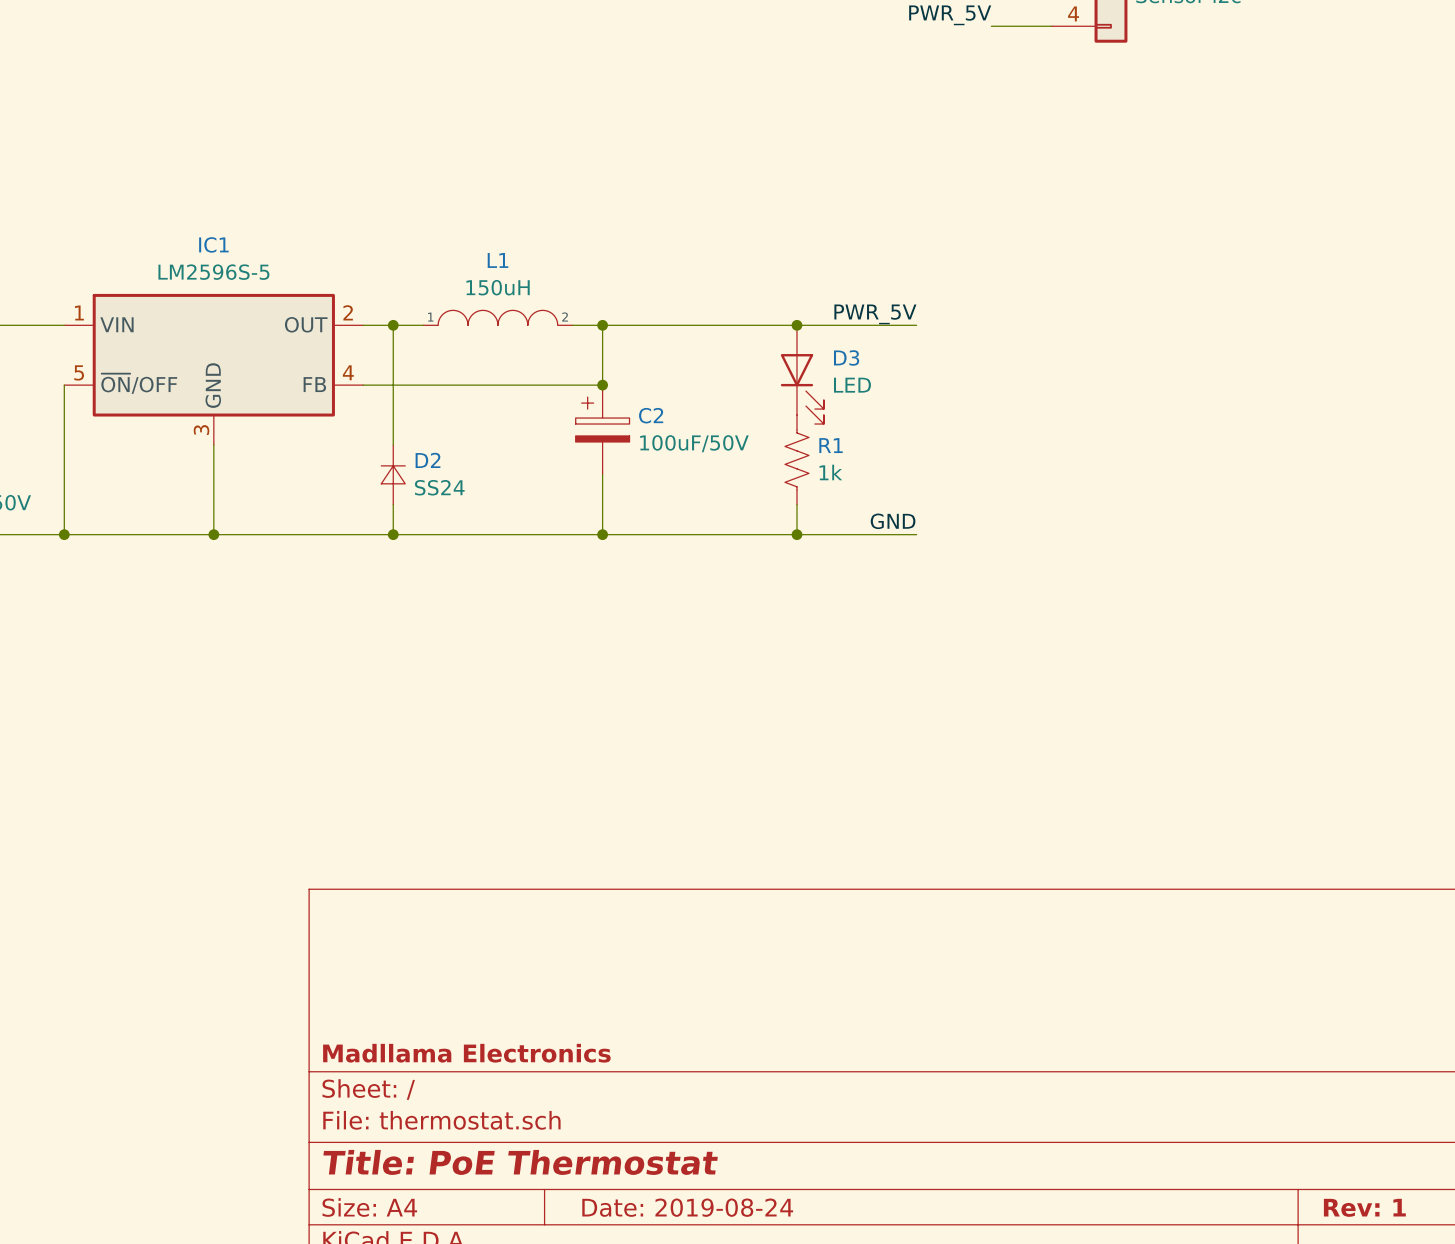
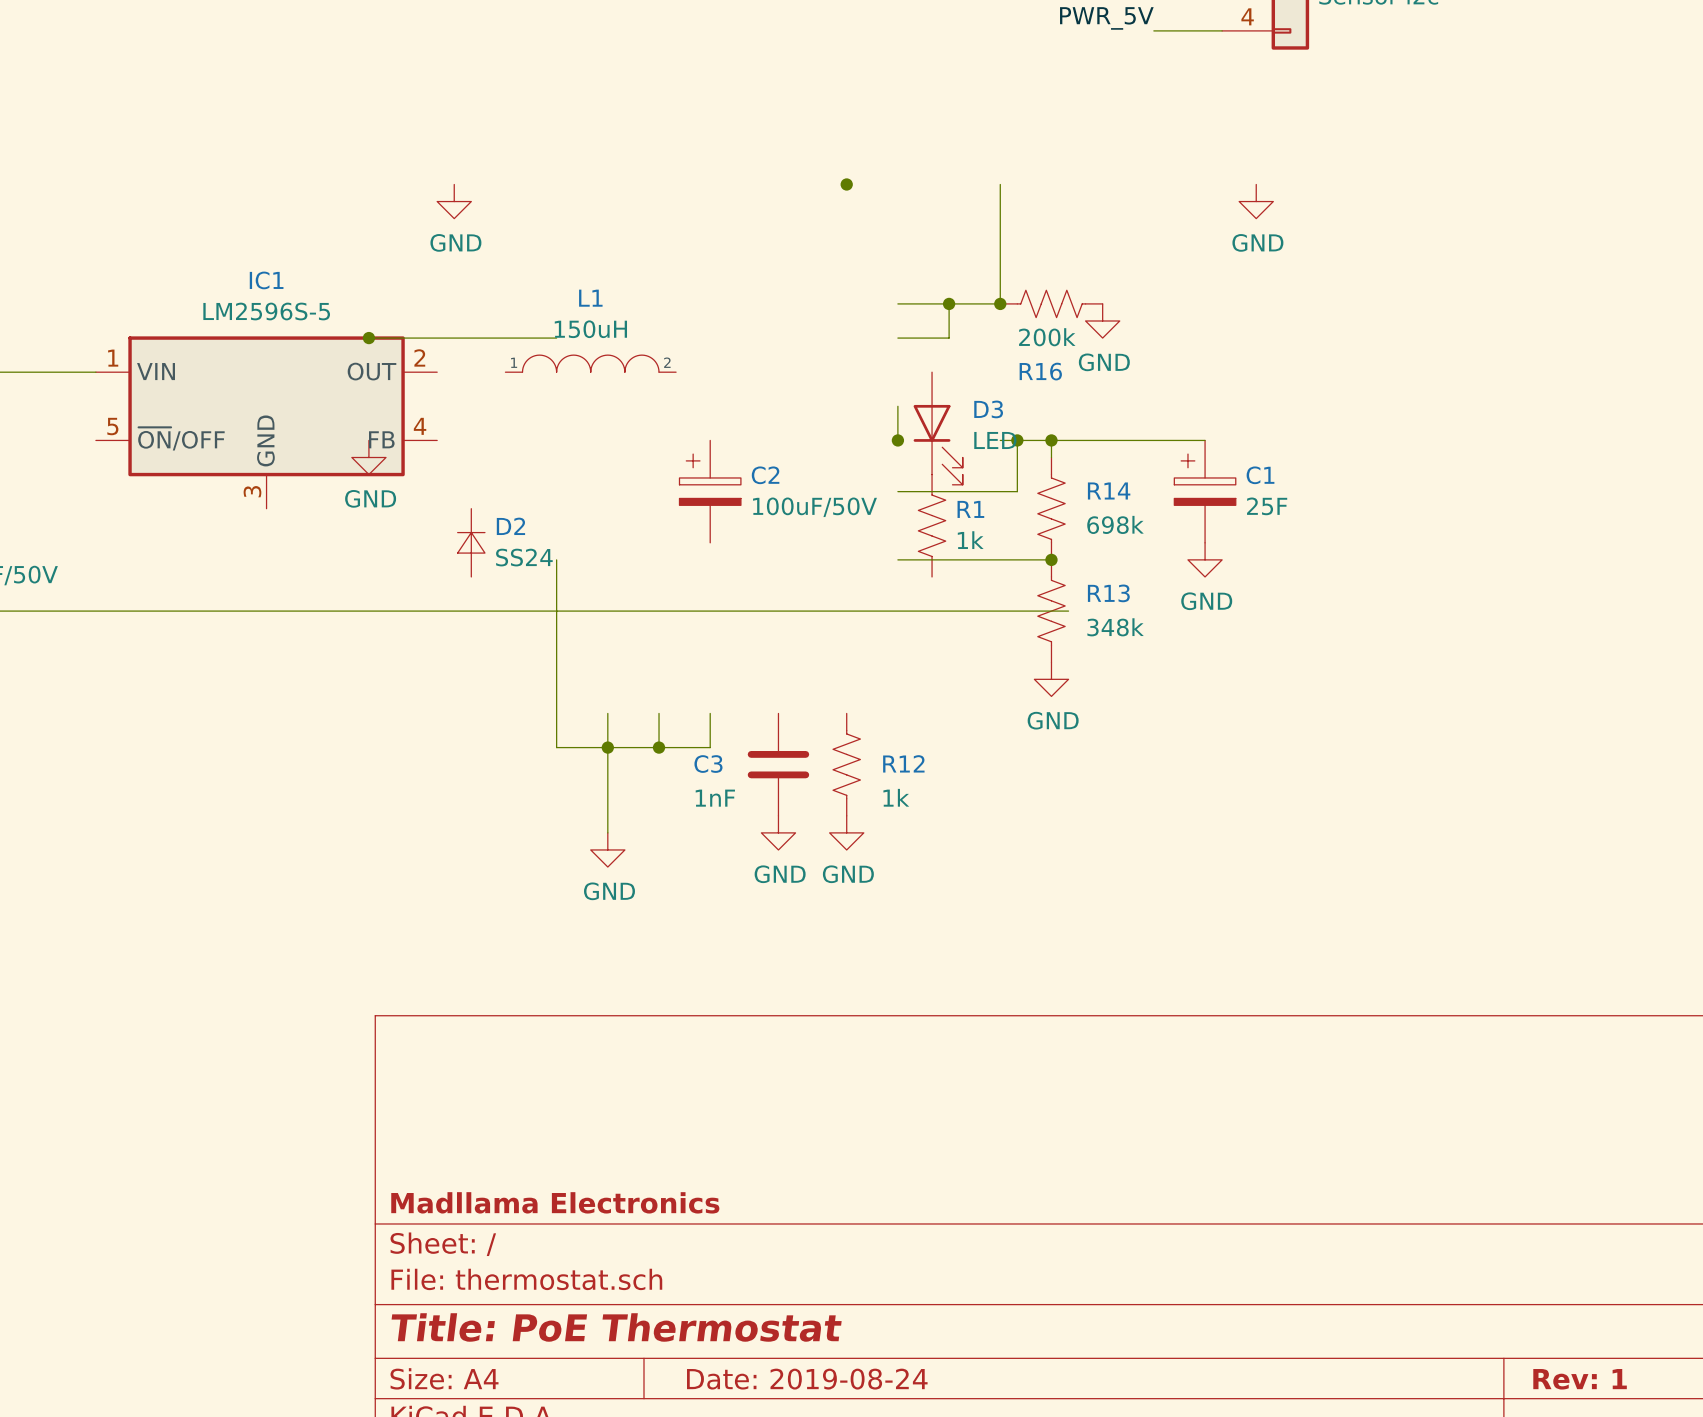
junction: none -> (846, 184)
wire: none -> (1000, 184) (1000, 303) (897, 303)
power symbol: none -> GND (454, 201)
power symbol: none -> GND (1256, 201)
wire: none -> (949, 303) (949, 338) (897, 338)
junction: none -> (949, 303)
junction: none -> (1000, 303)
R16: none -> 200k (1051, 303)
power symbol: none -> GND (1102, 320)
wire: none -> (368, 338) (556, 338)
junction: none -> (368, 338)
label: PWR_5V (875, 314) -> none
wire: (363, 325) (423, 325) -> none
wire: (393, 325) (393, 444) -> none
junction: (393, 325) -> none
wire: (572, 325) (916, 325) -> none
wire: (602, 325) (602, 385) (363, 385) -> none
junction: (602, 325) -> none
junction: (796, 325) -> none
wire: (64, 385) (64, 534) -> none
junction: (602, 385) -> none
junction: none -> (897, 440)
wire: none -> (1000, 440) (1205, 440)
wire: none -> (1017, 440) (1017, 491) (897, 491)
junction: none -> (1017, 440)
wire: none -> (1051, 440) (1051, 457)
junction: none -> (1051, 440)
power symbol: none -> GND (368, 457)
C1: none -> 25F (1205, 491)
wire: (213, 444) (213, 534) -> none
R14: none -> 698k (1051, 508)
wire: (602, 474) (602, 534) -> none
wire: none -> (556, 559) (556, 747) (710, 747) (710, 713)
wire: none -> (897, 559) (1051, 559)
junction: none -> (1051, 559)
power symbol: none -> GND (1205, 559)
wire: (393, 504) (393, 534) -> (659, 713) (659, 747)
wire: (796, 504) (796, 534) -> (897, 406) (897, 440)
label: GND (893, 521) -> none
junction: (64, 534) -> none
junction: (213, 534) -> none
junction: (393, 534) -> none
junction: (602, 534) -> none
junction: (796, 534) -> none
R13: none -> 348k (1051, 611)
power symbol: none -> GND (1051, 679)
wire: none -> (607, 713) (607, 832)
junction: none -> (607, 747)
junction: none -> (659, 747)
C3: none -> 1nF (778, 764)
R12: none -> 1k (846, 764)
power symbol: none -> GND (778, 832)
power symbol: none -> GND (846, 832)
power symbol: none -> GND (607, 849)

